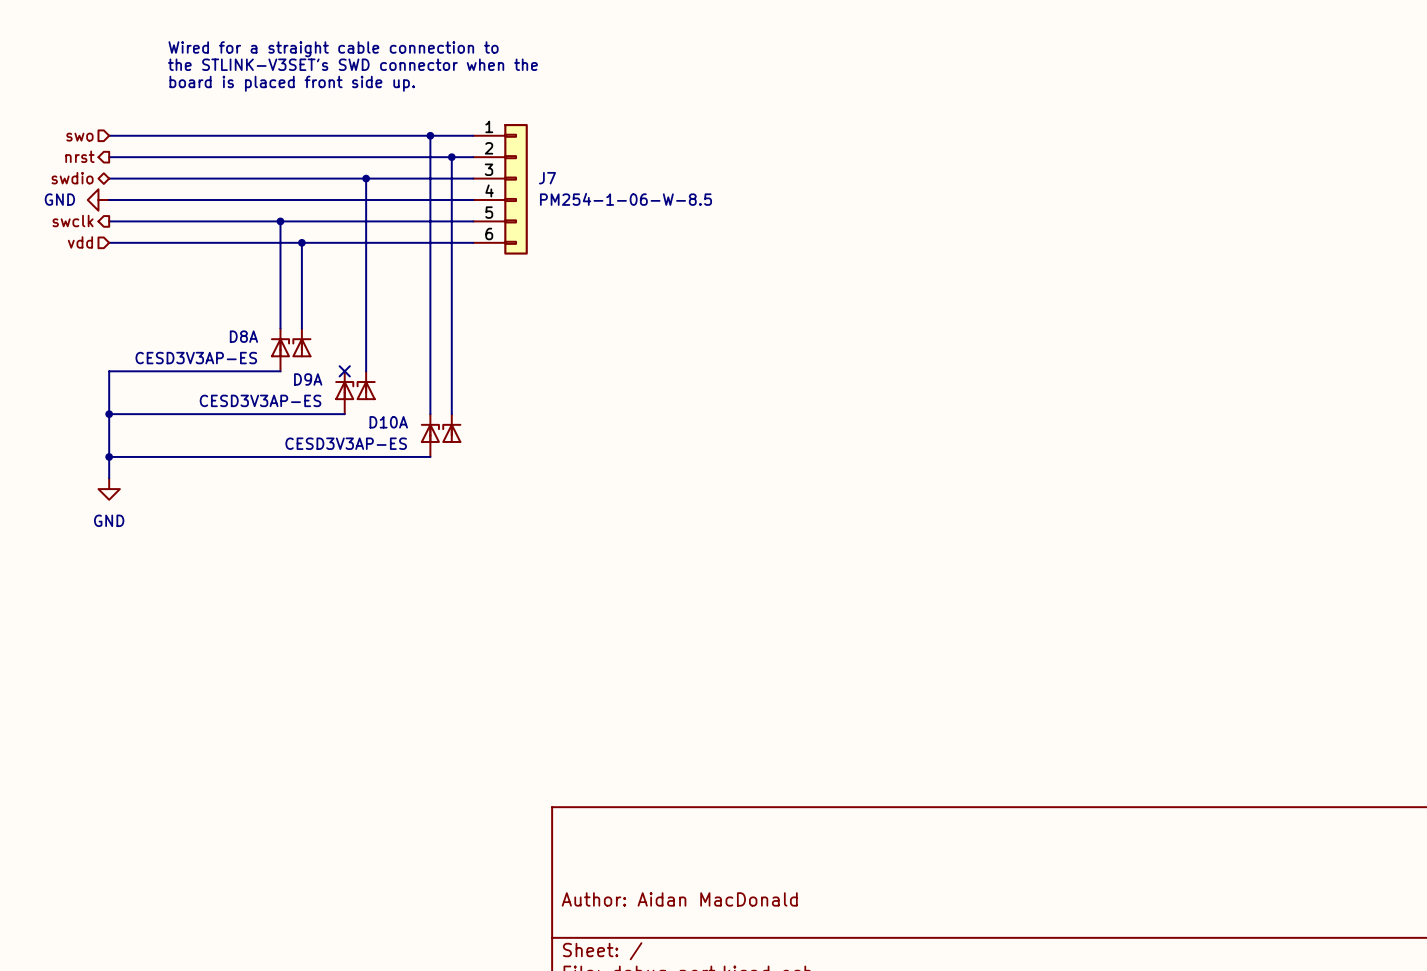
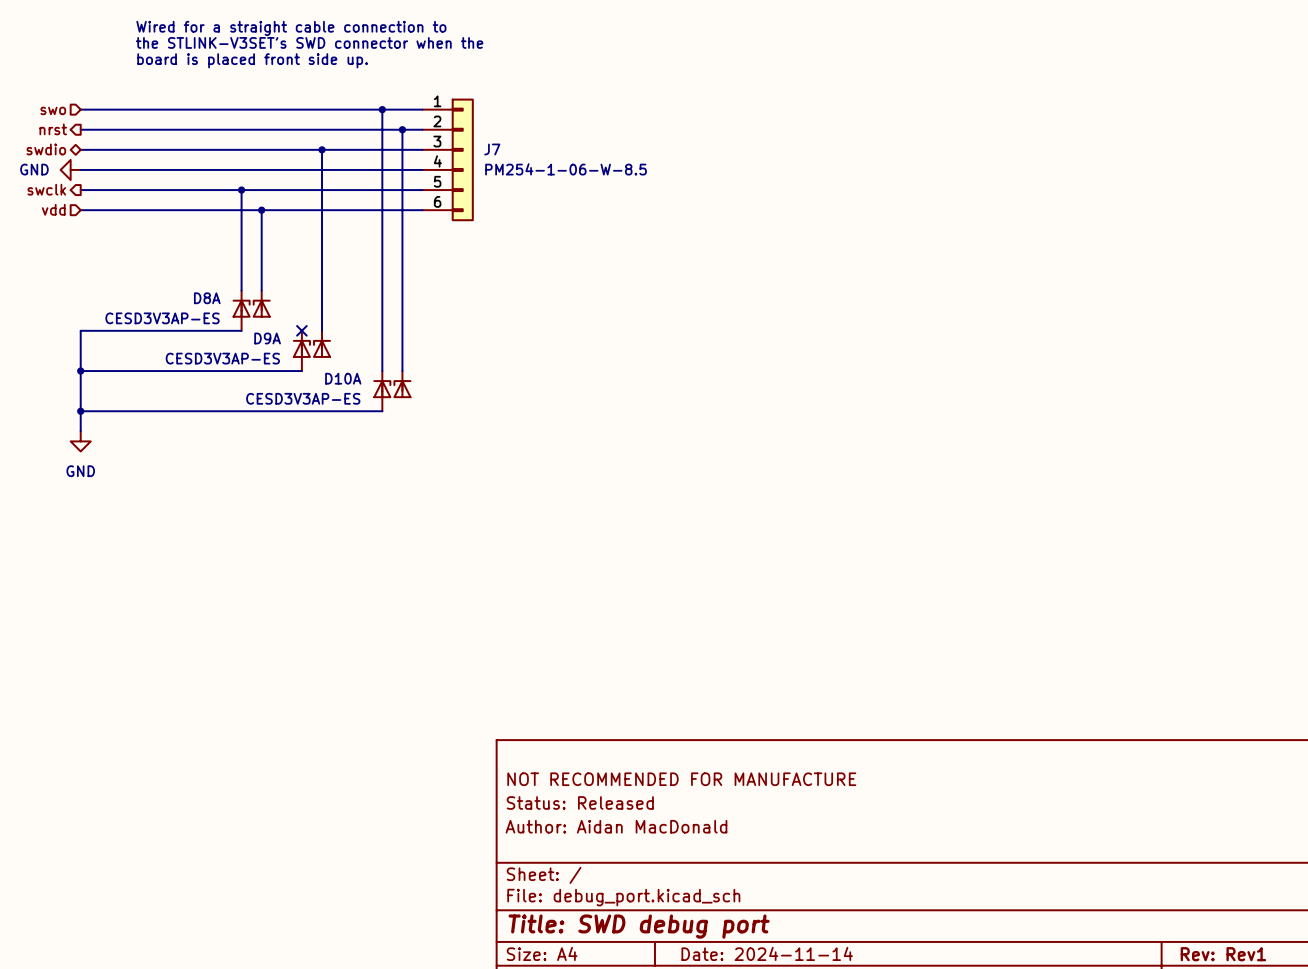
title block: none -> NOT RECOMMENDED FOR MANUFACTURE (681, 779)
title block: none -> Status: Released (580, 802)

